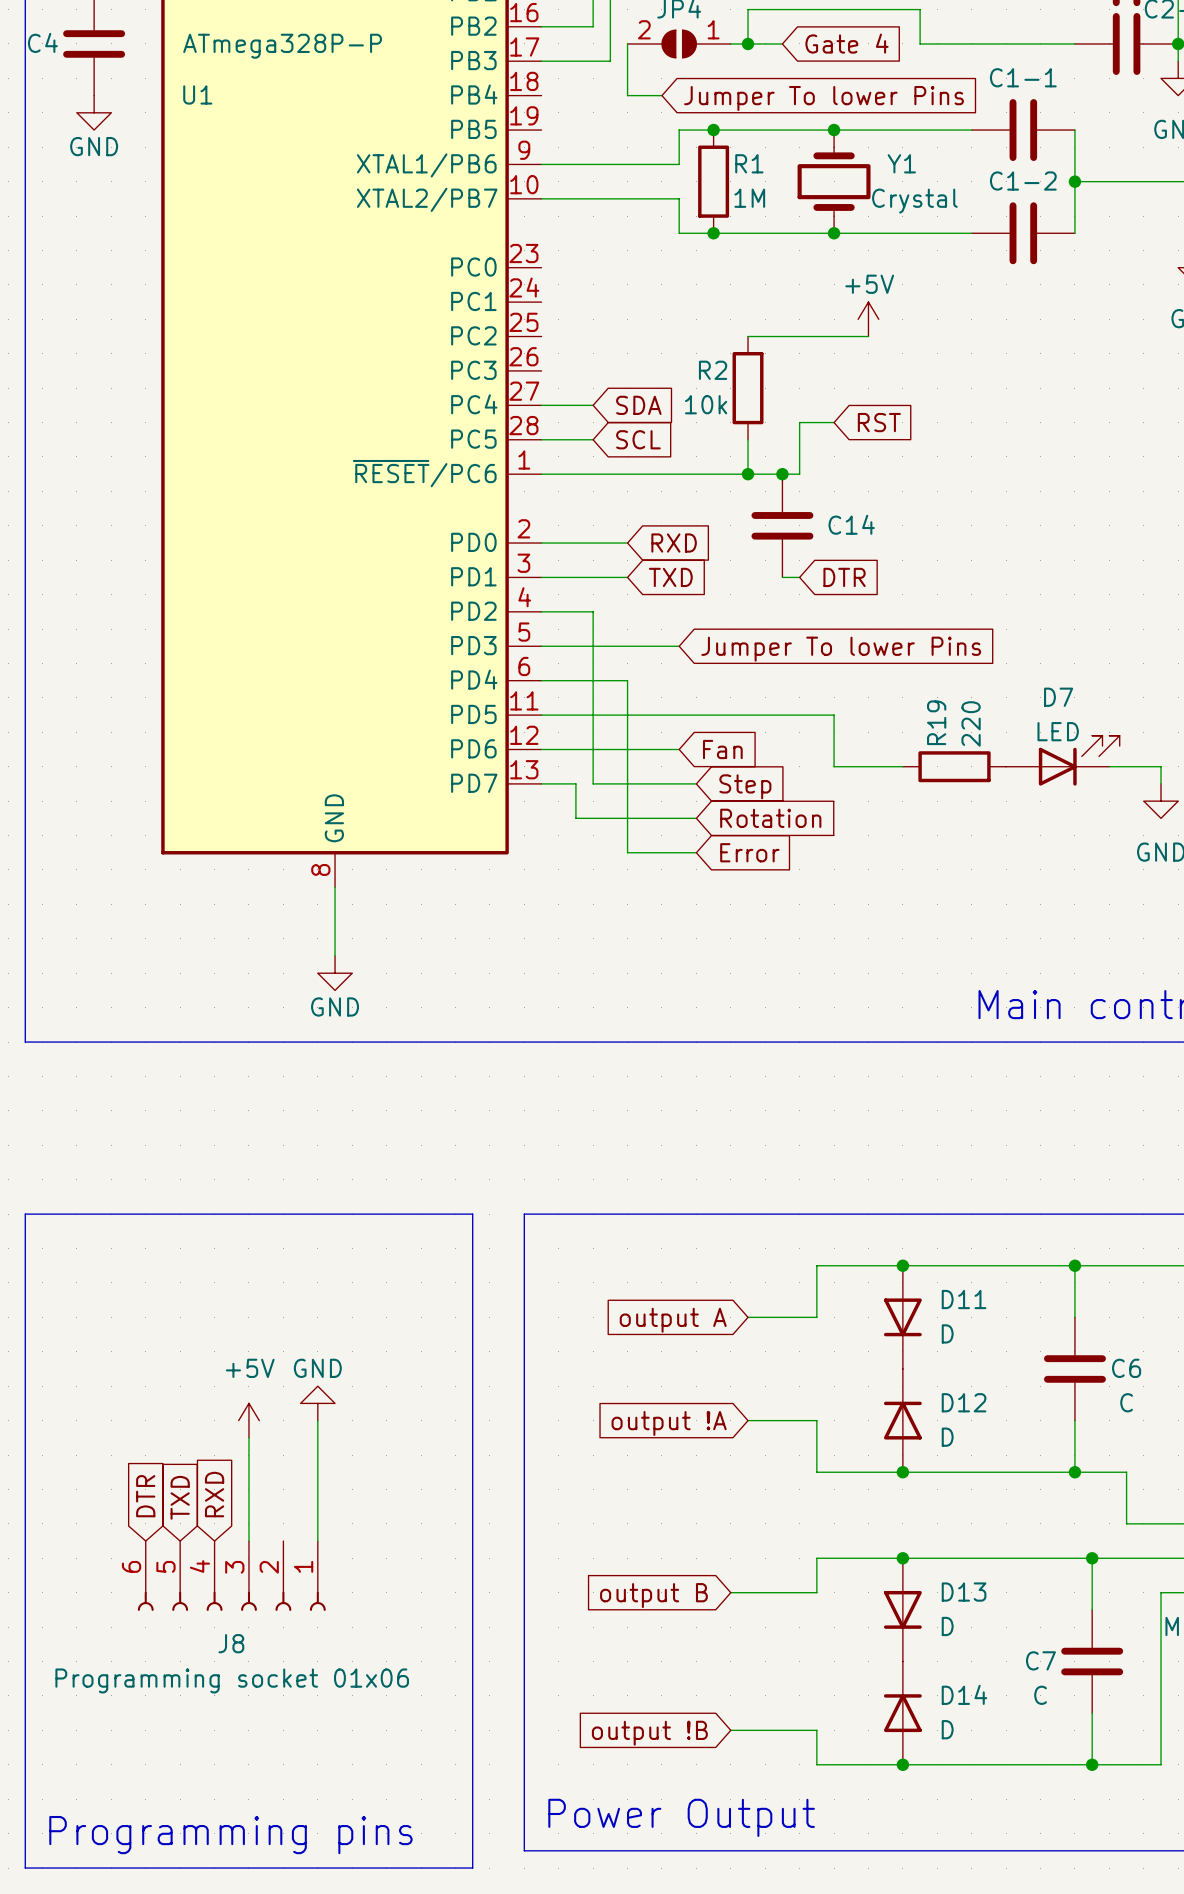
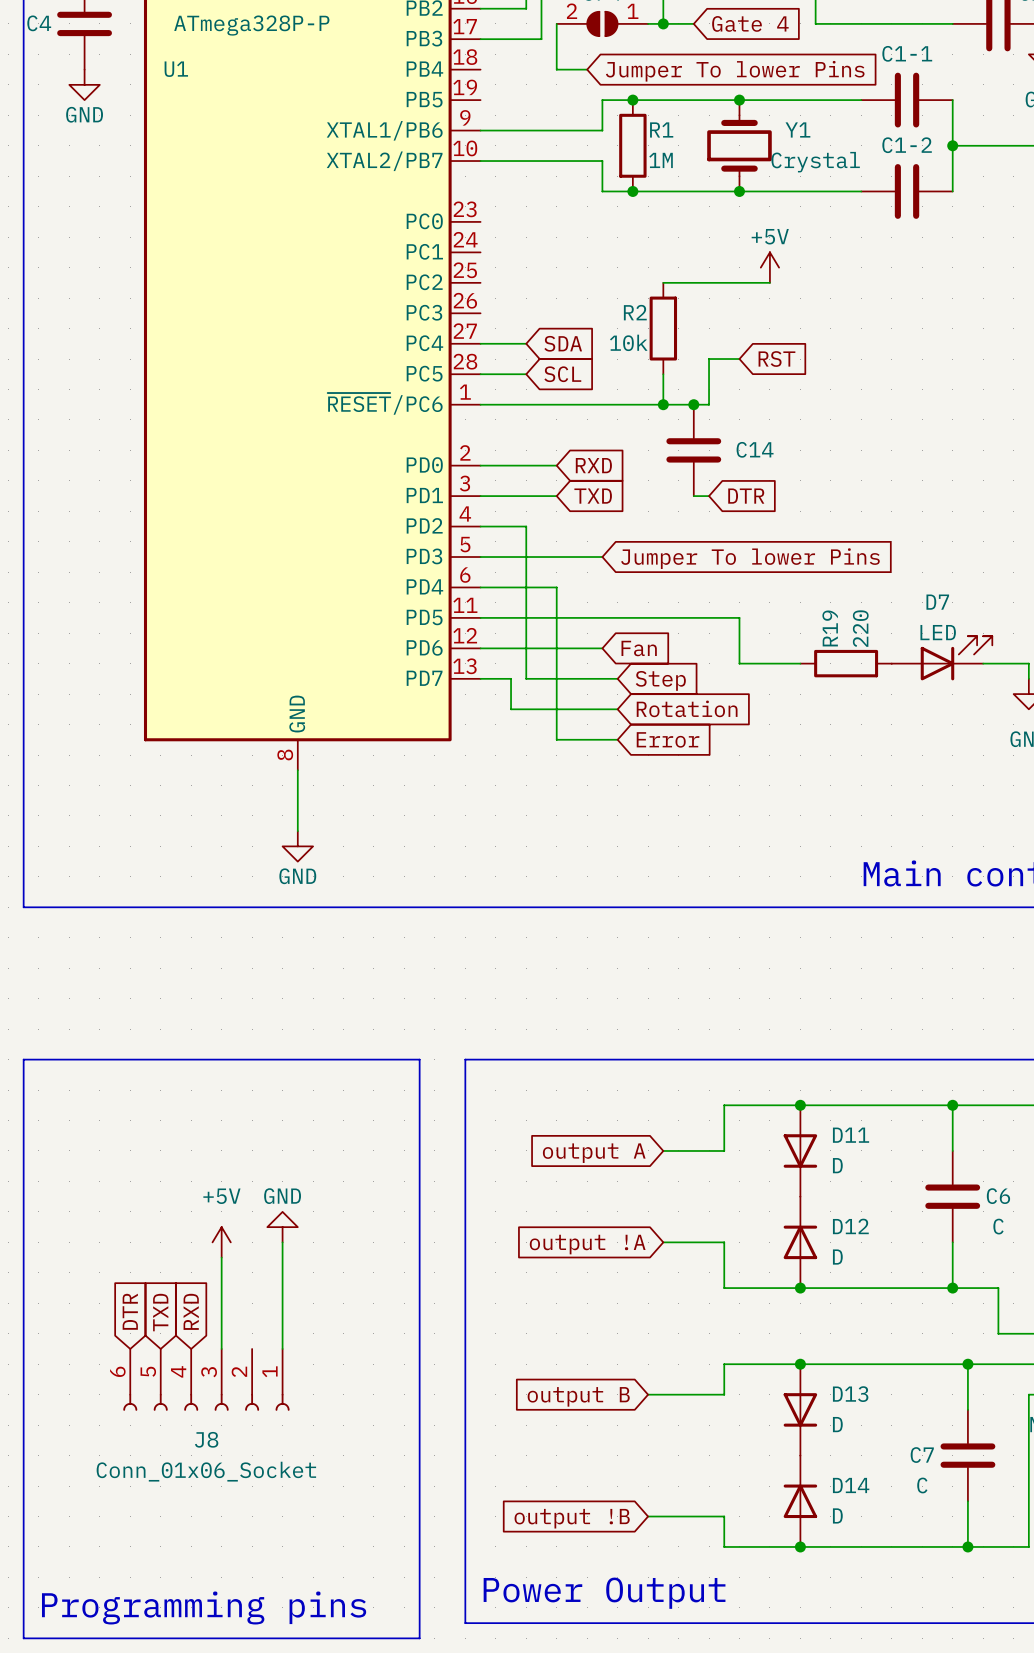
J8 value: Programming socket 01x06 (232, 1680) -> Conn_01x06_Socket (206, 1471)

